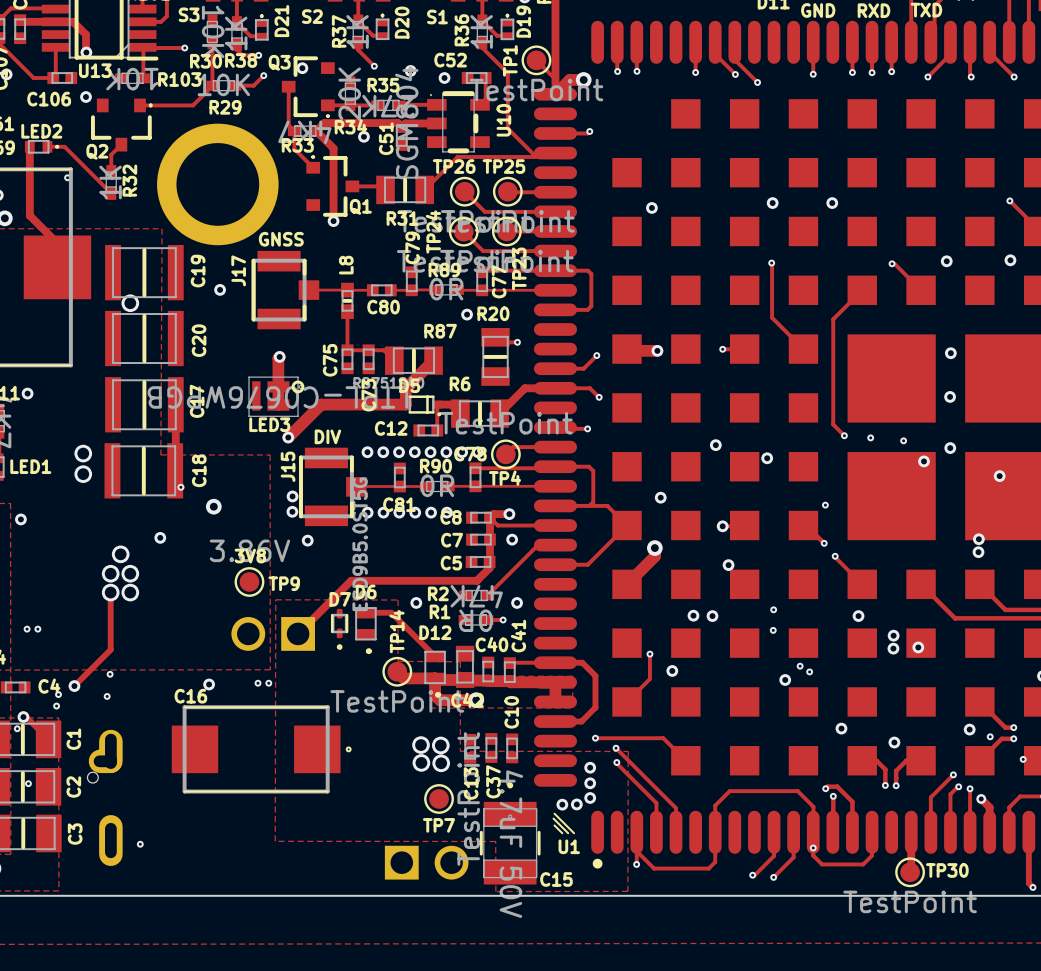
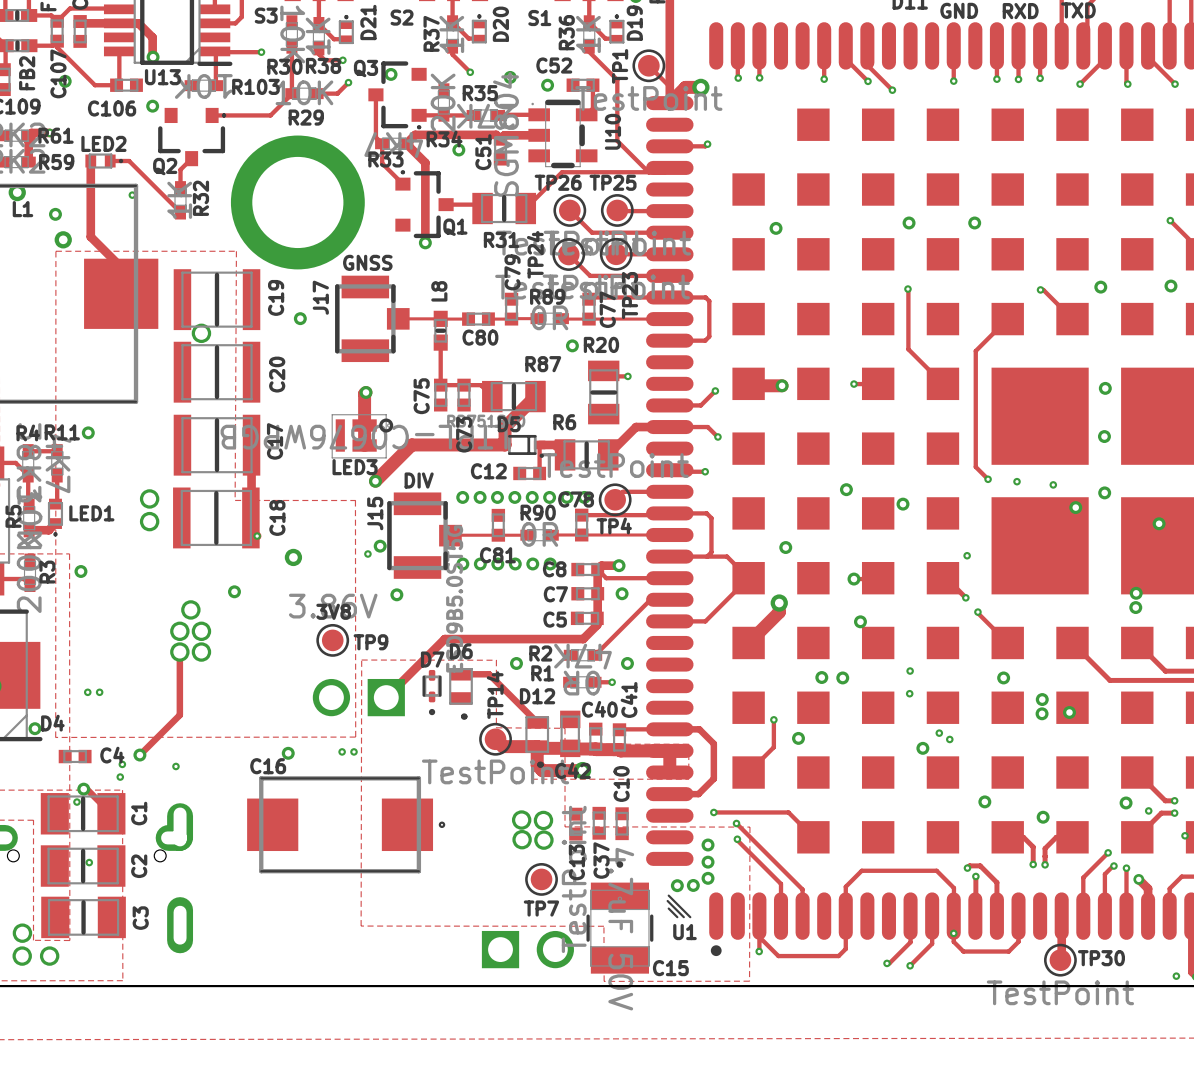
via: none -> (367, 554)
via: (292, 511) -> none
via: (110, 674) -> none
via: (140, 844) -> none
via: none -> (1176, 976)

